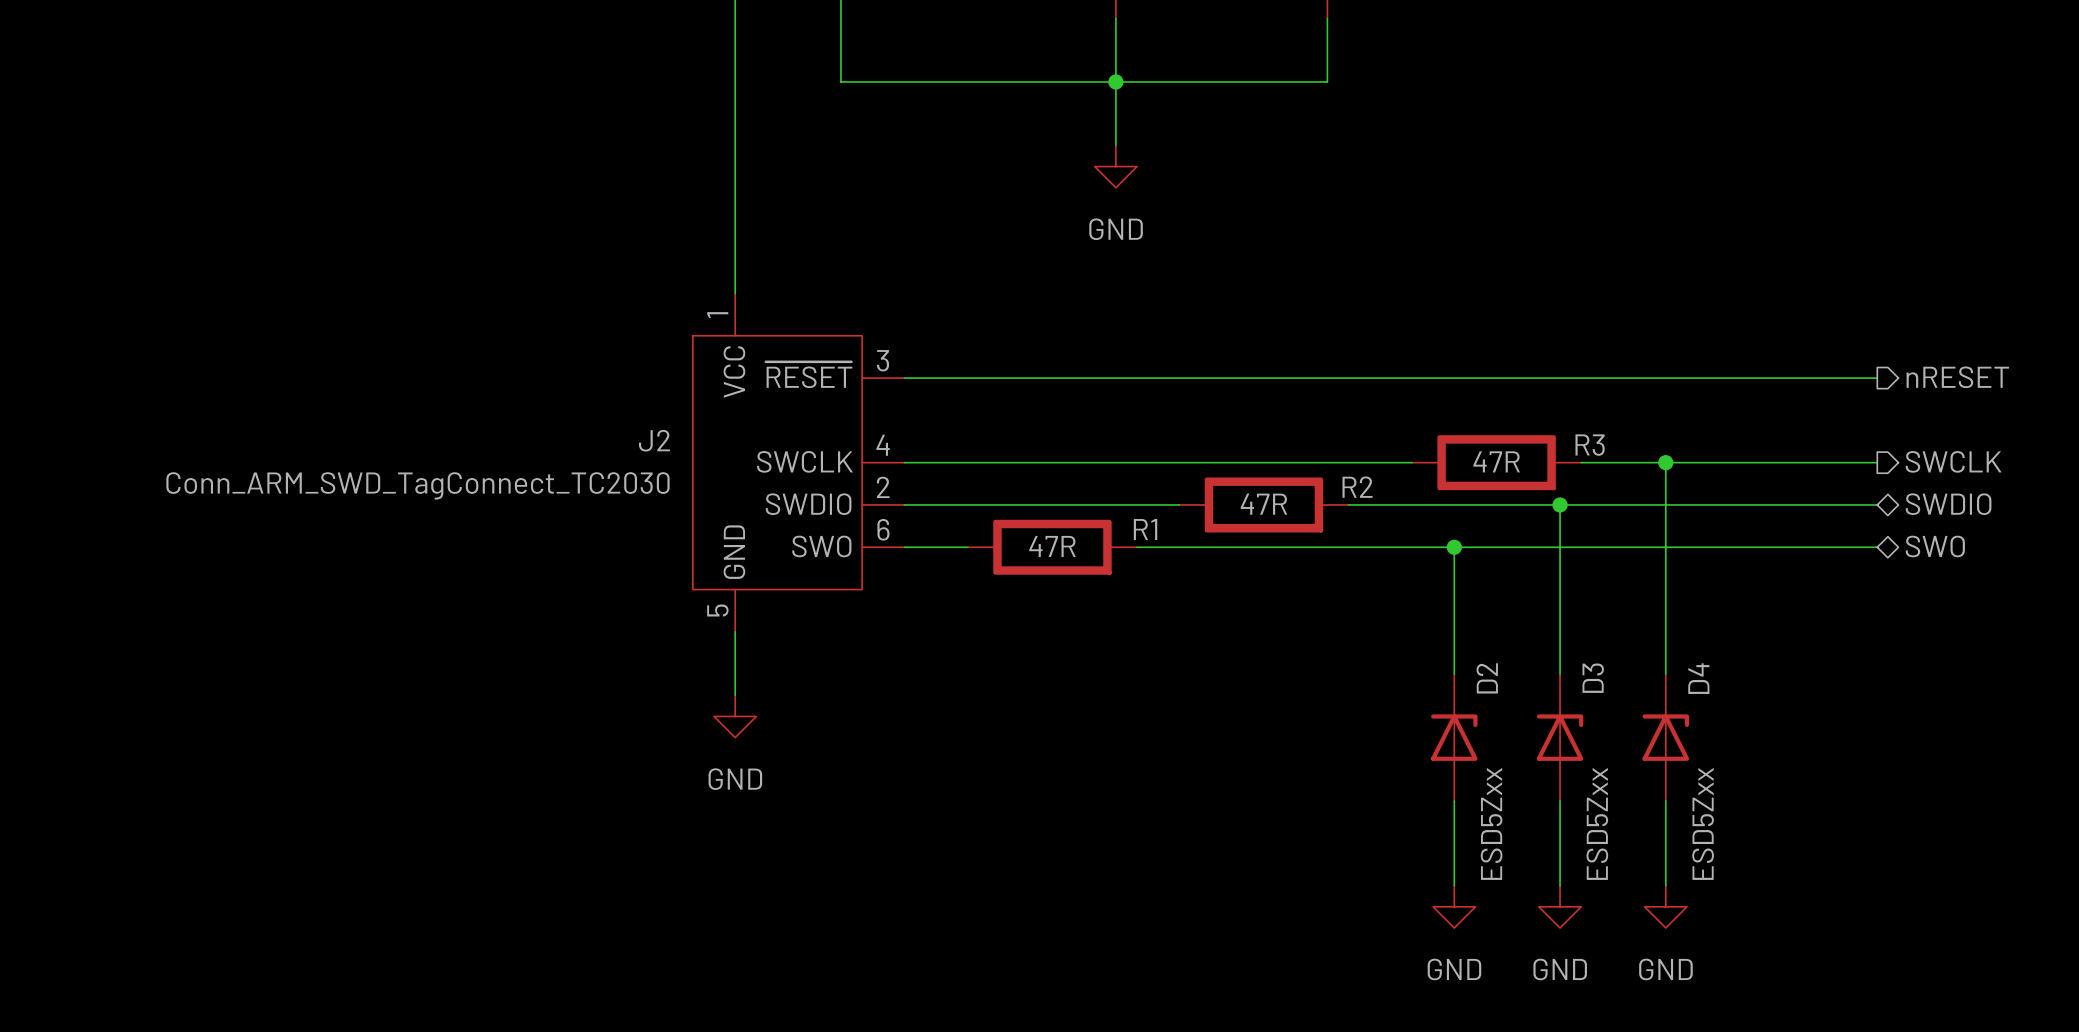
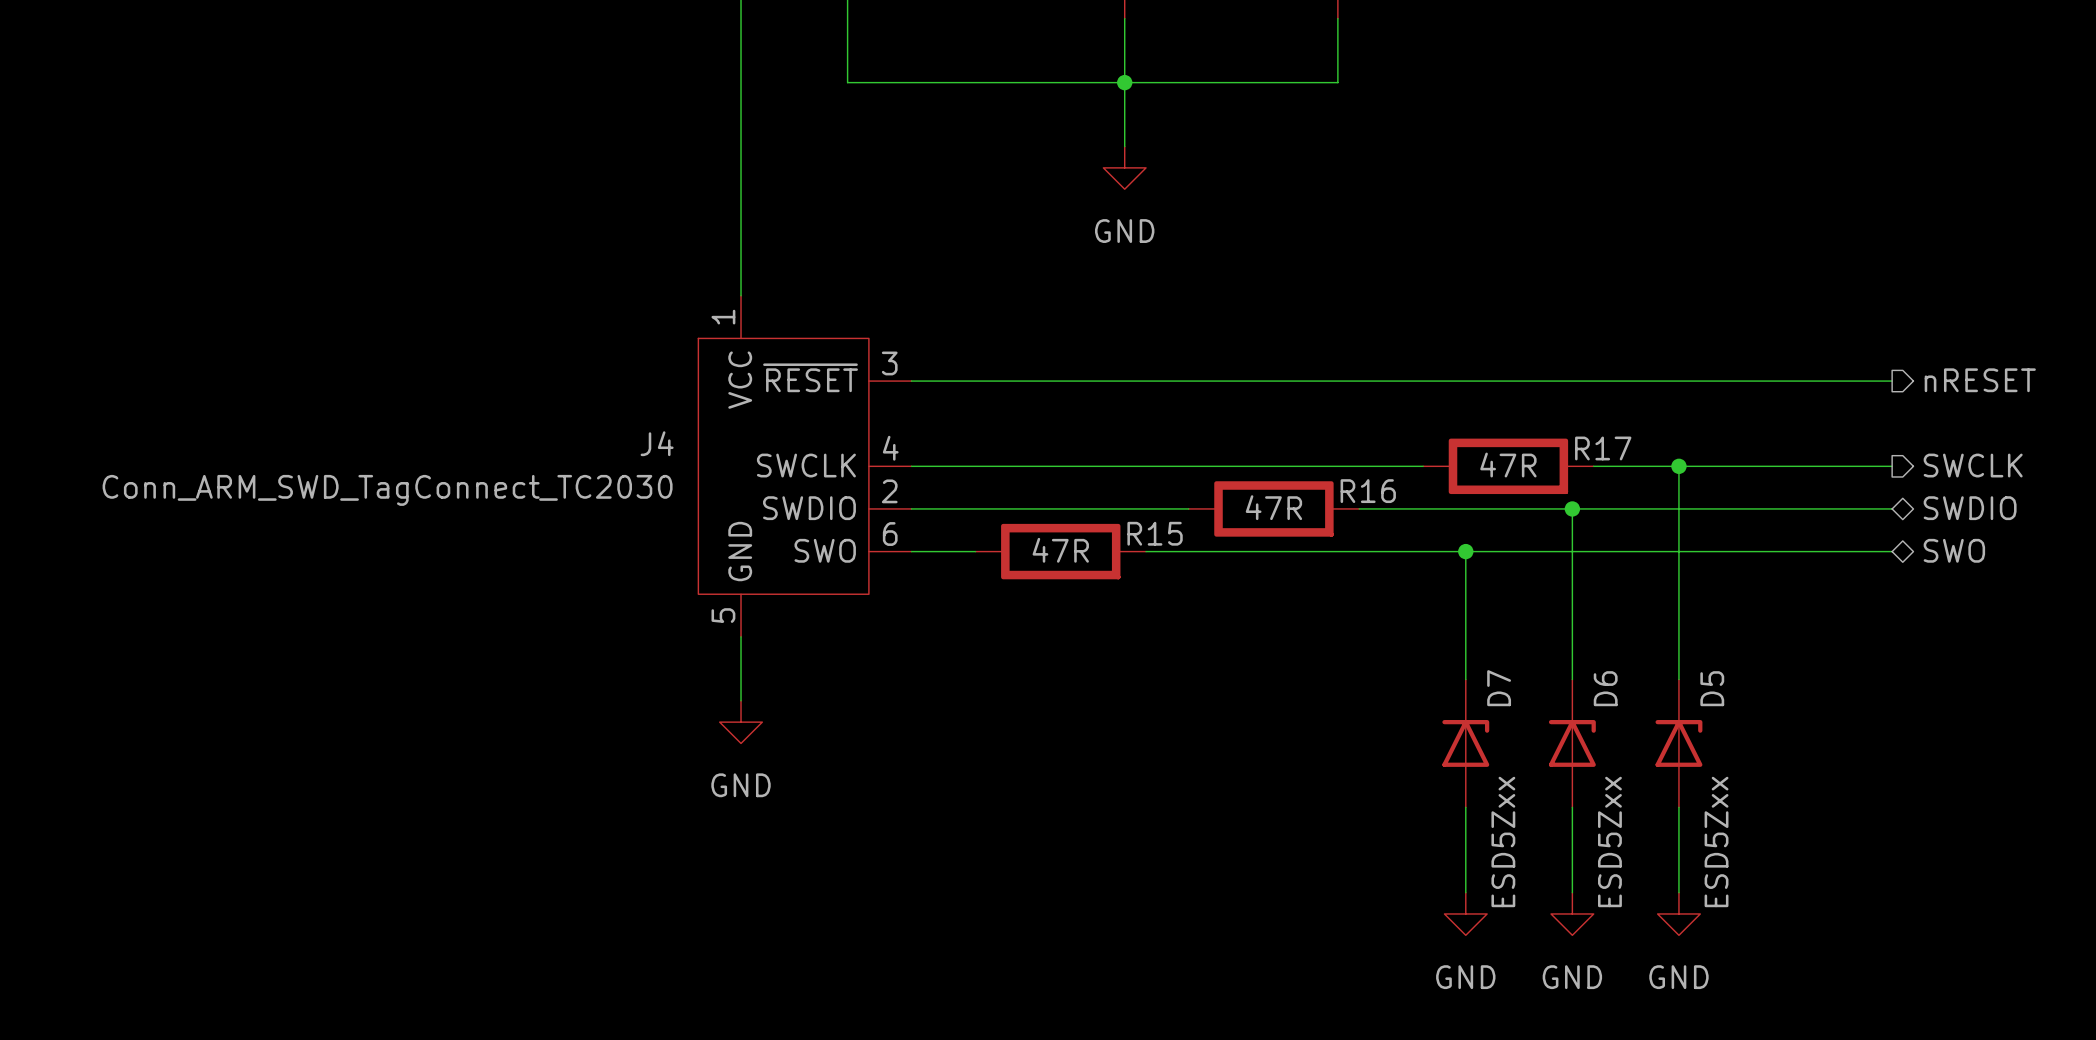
J2 name: J2 (654, 440) -> J4 (657, 443)
R3 name: R3 (1590, 445) -> R17 (1603, 448)
R2 name: R2 (1357, 487) -> R16 (1368, 491)
R1 name: R1 (1145, 529) -> R15 (1155, 533)
D2 name: D2 (1487, 678) -> D7 (1499, 688)
D3 name: D3 (1593, 678) -> D6 (1605, 688)
D4 name: D4 (1698, 678) -> D5 (1712, 688)

